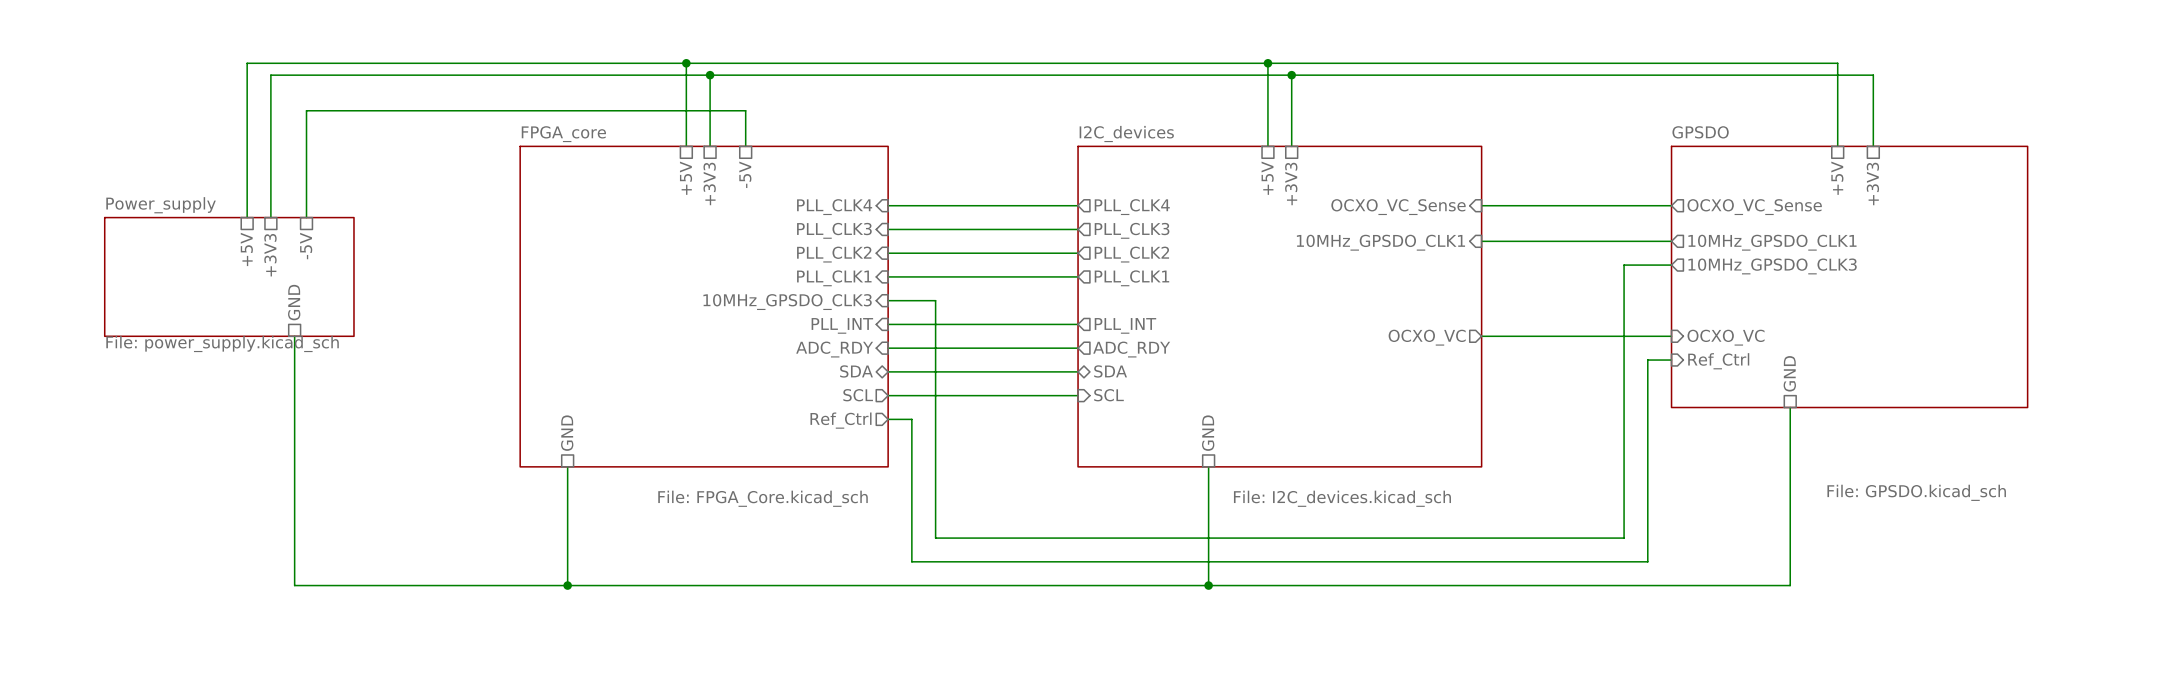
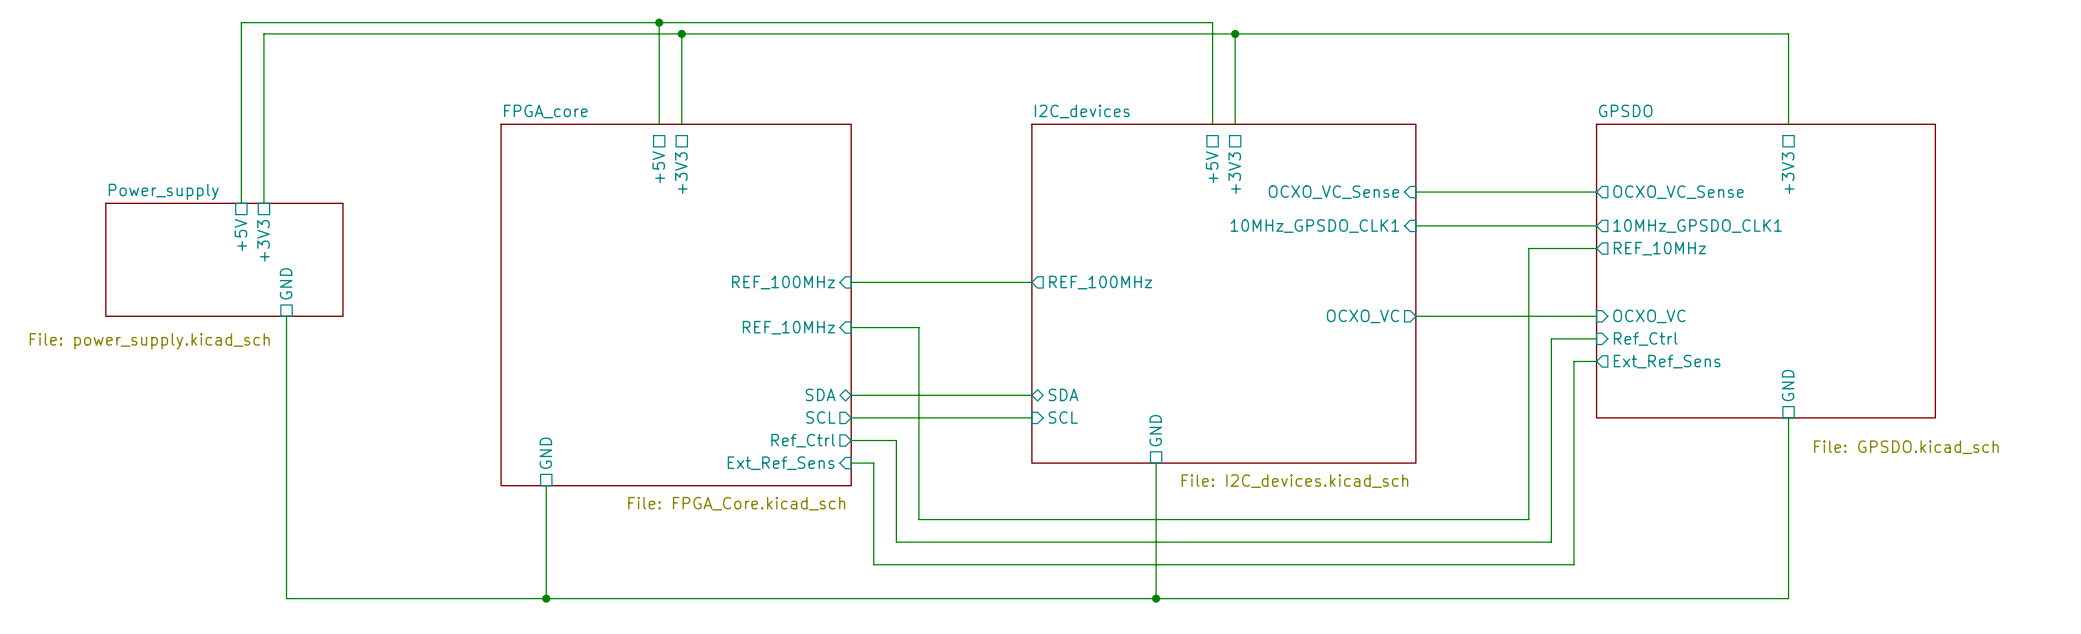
wire: none -> (659, 22) (659, 56)
junction: none -> (659, 22)
wire: none -> (681, 33) (681, 67)
junction: none -> (681, 33)
wire: none -> (1235, 33) (1235, 67)
junction: none -> (1235, 33)
wire: (247, 63) (1837, 63) (1837, 146) -> (241, 56) (241, 22) (1212, 22) (1212, 56)
junction: (686, 63) -> none
junction: (1267, 63) -> none
wire: (270, 75) (1873, 75) -> (263, 67) (263, 33) (1788, 33) (1788, 67)
junction: (710, 75) -> none
junction: (1291, 75) -> none
wire: (686, 134) (686, 146) -> none
wire: (710, 134) (710, 146) -> none
wire: (1267, 134) (1267, 146) -> none
wire: (1291, 134) (1291, 146) -> none
wire: (1873, 134) (1873, 146) -> none
sheet I2C_devices shape: [1077, 145, 1483, 468] -> [1031, 123, 1417, 464]
wire: (745, 146) (745, 110) (306, 110) (306, 217) -> none
sheet pin: -5V (745, 174) -> none
sheet pin: +5V (1837, 178) -> none
wire: (888, 205) (1078, 205) -> none
sheet pin: PLL_CLK4 (834, 207) -> none
sheet pin: PLL_CLK4 (1132, 207) -> none
wire: (888, 229) (1078, 229) -> none
sheet pin: PLL_CLK3 (834, 230) -> none
sheet pin: PLL_CLK3 (1132, 230) -> none
sheet pin: -5V (306, 246) -> none
wire: (888, 253) (1078, 253) -> none
sheet pin: PLL_CLK2 (834, 254) -> none
sheet pin: PLL_CLK2 (1131, 254) -> none
wire: (1624, 265) (1624, 360) -> none
sheet pin: 10MHz_GPSDO_CLK3 (1772, 266) -> REF_10MHz (1659, 248)
wire: (888, 276) (1078, 276) -> none
sheet GPSDO: File: GPSDO.kicad_sch (1849, 276) -> none
sheet pin: PLL_CLK1 (834, 278) -> none
sheet pin: PLL_CLK1 (1131, 278) -> none
sheet GPSDO: none -> File: GPSDO.kicad_sch (1765, 271)
wire: (935, 300) (935, 466) -> (851, 440) (896, 440)
wire: none -> (896, 282) (1031, 282)
sheet pin: 10MHz_GPSDO_CLK3 (787, 302) -> REF_100MHz (783, 282)
sheet pin: none -> REF_100MHz (1100, 282)
sheet FPGA_core: File: FPGA_Core.kicad_sch (704, 306) -> none
sheet FPGA_core: none -> File: FPGA_Core.kicad_sch (676, 304)
wire: (888, 324) (1078, 324) -> (851, 417) (1031, 417)
sheet pin: PLL_INT (842, 325) -> none
sheet pin: PLL_INT (1125, 325) -> none
sheet Power_supply value position: File: power_supply.kicad_sch (222, 343) -> File: power_supply.kicad_sch (149, 341)
wire: (959, 348) (1078, 348) -> (918, 327) (918, 519) (1528, 519) (1528, 248) (1551, 248)
sheet pin: ADC_RDY (834, 349) -> REF_10MHz (788, 327)
sheet pin: ADC_RDY (1131, 349) -> none
wire: (1647, 360) (1647, 383) -> (1573, 338) (1551, 338)
sheet pin: SDA (856, 371) -> none
wire: (888, 371) (1078, 371) -> none
sheet pin position: SDA (1110, 371) -> SDA (1063, 394)
sheet pin position: GND (1789, 373) -> GND (1788, 385)
wire: none -> (1573, 361) (1596, 361)
sheet pin: none -> Ext_Ref_Sens (1667, 361)
sheet pin position: SCL (858, 395) -> SCL (820, 417)
wire: (888, 395) (1078, 395) -> none
sheet pin position: SCL (1109, 395) -> SCL (1063, 417)
wire: (1790, 407) (1790, 585) (294, 585) -> (1788, 417) (1788, 598) (286, 598) (286, 553)
wire: (911, 419) (911, 490) -> (851, 463) (873, 463)
wire: none -> (873, 395) (1031, 395)
sheet pin shape: output (841, 420) -> bidirectional (820, 394)
sheet pin: Ref_Ctrl (841, 420) -> SDA (820, 394)
sheet pin position: GND (567, 433) -> GND (545, 453)
sheet pin position: GND (1208, 433) -> GND (1155, 430)
wire: (567, 466) (567, 514) -> (546, 553) (546, 598)
wire: (1208, 466) (1208, 490) -> none
sheet pin: none -> Ref_Ctrl (803, 440)
sheet pin: none -> Ext_Ref_Sens (781, 463)
wire: (935, 538) (1624, 538) -> (896, 508) (896, 542) (1551, 542) (1551, 508)
wire: (911, 561) (1647, 561) -> (873, 530) (873, 564) (1573, 564) (1573, 530)
junction position: (567, 585) -> (546, 598)
wire: none -> (1156, 553) (1156, 598)
junction position: (1208, 585) -> (1156, 598)

